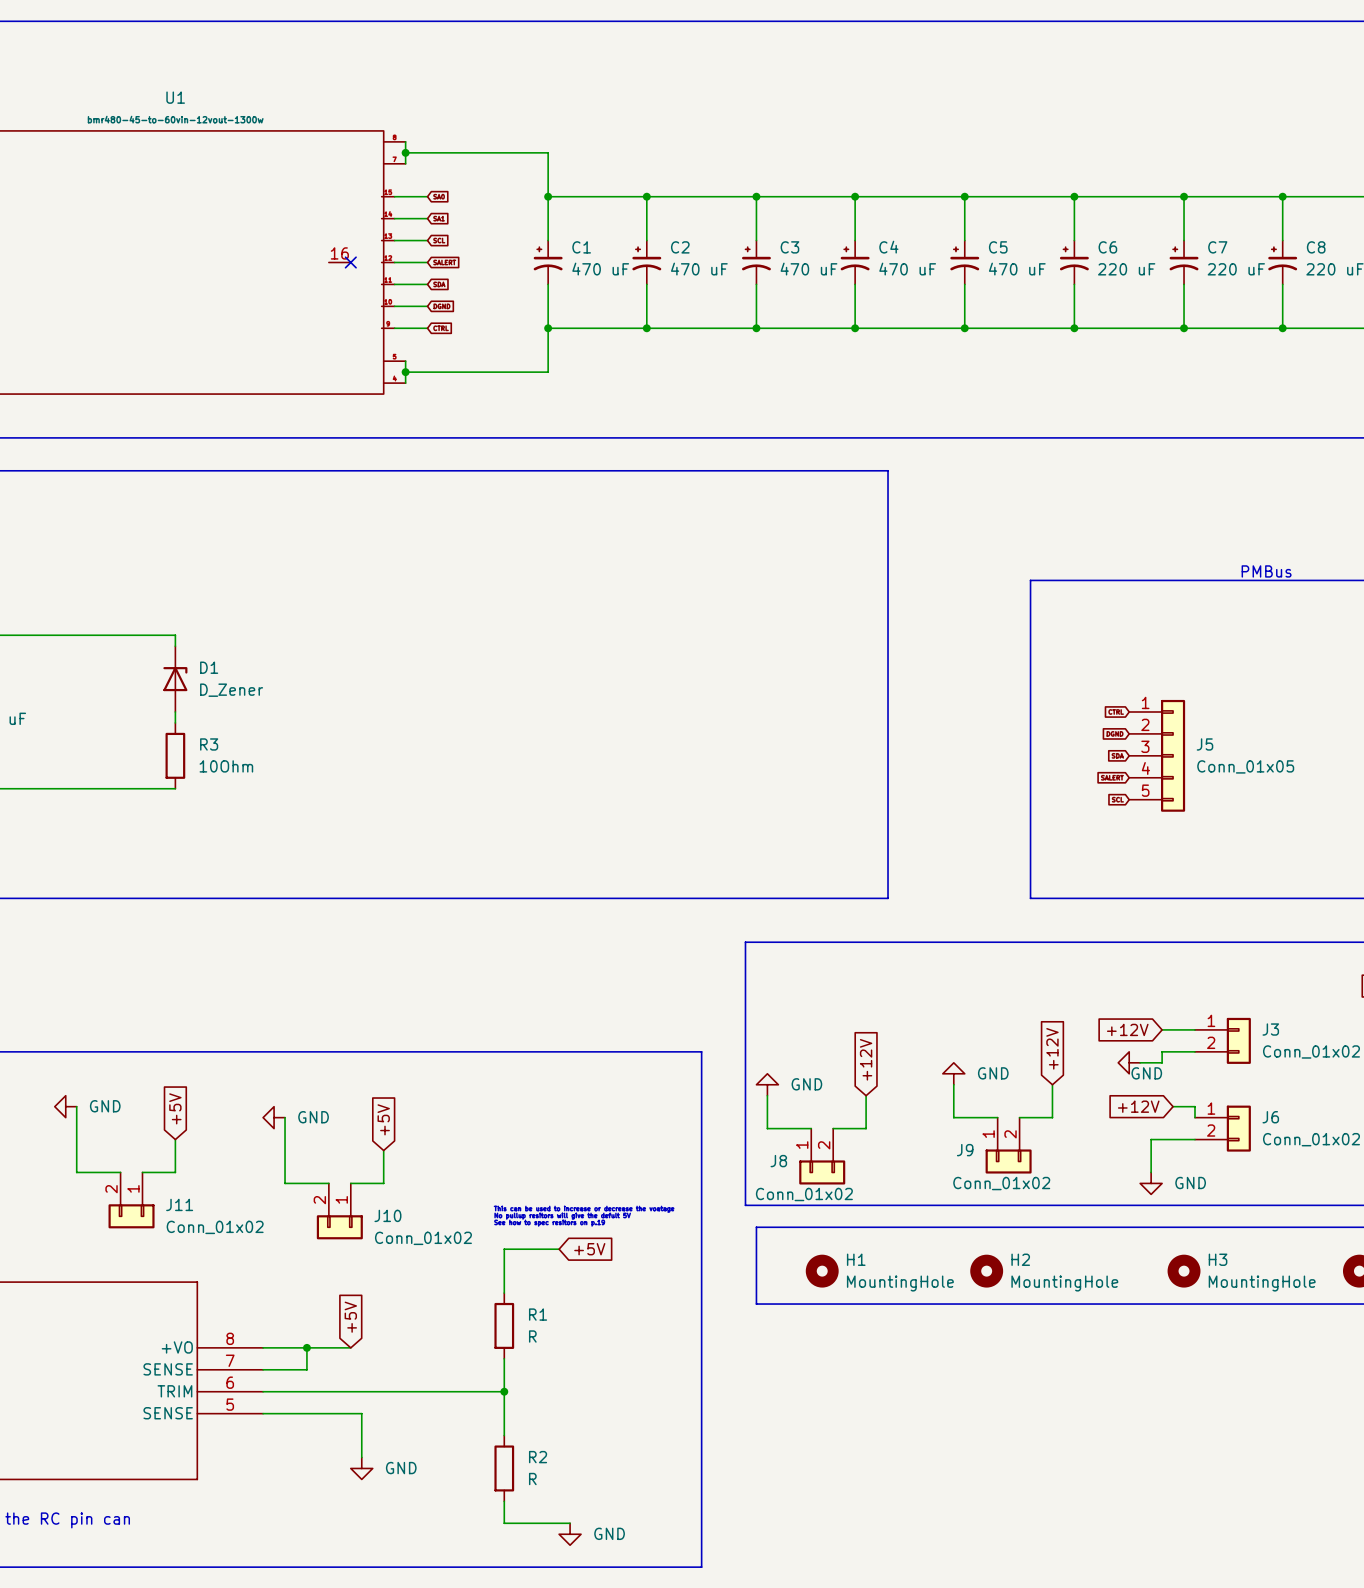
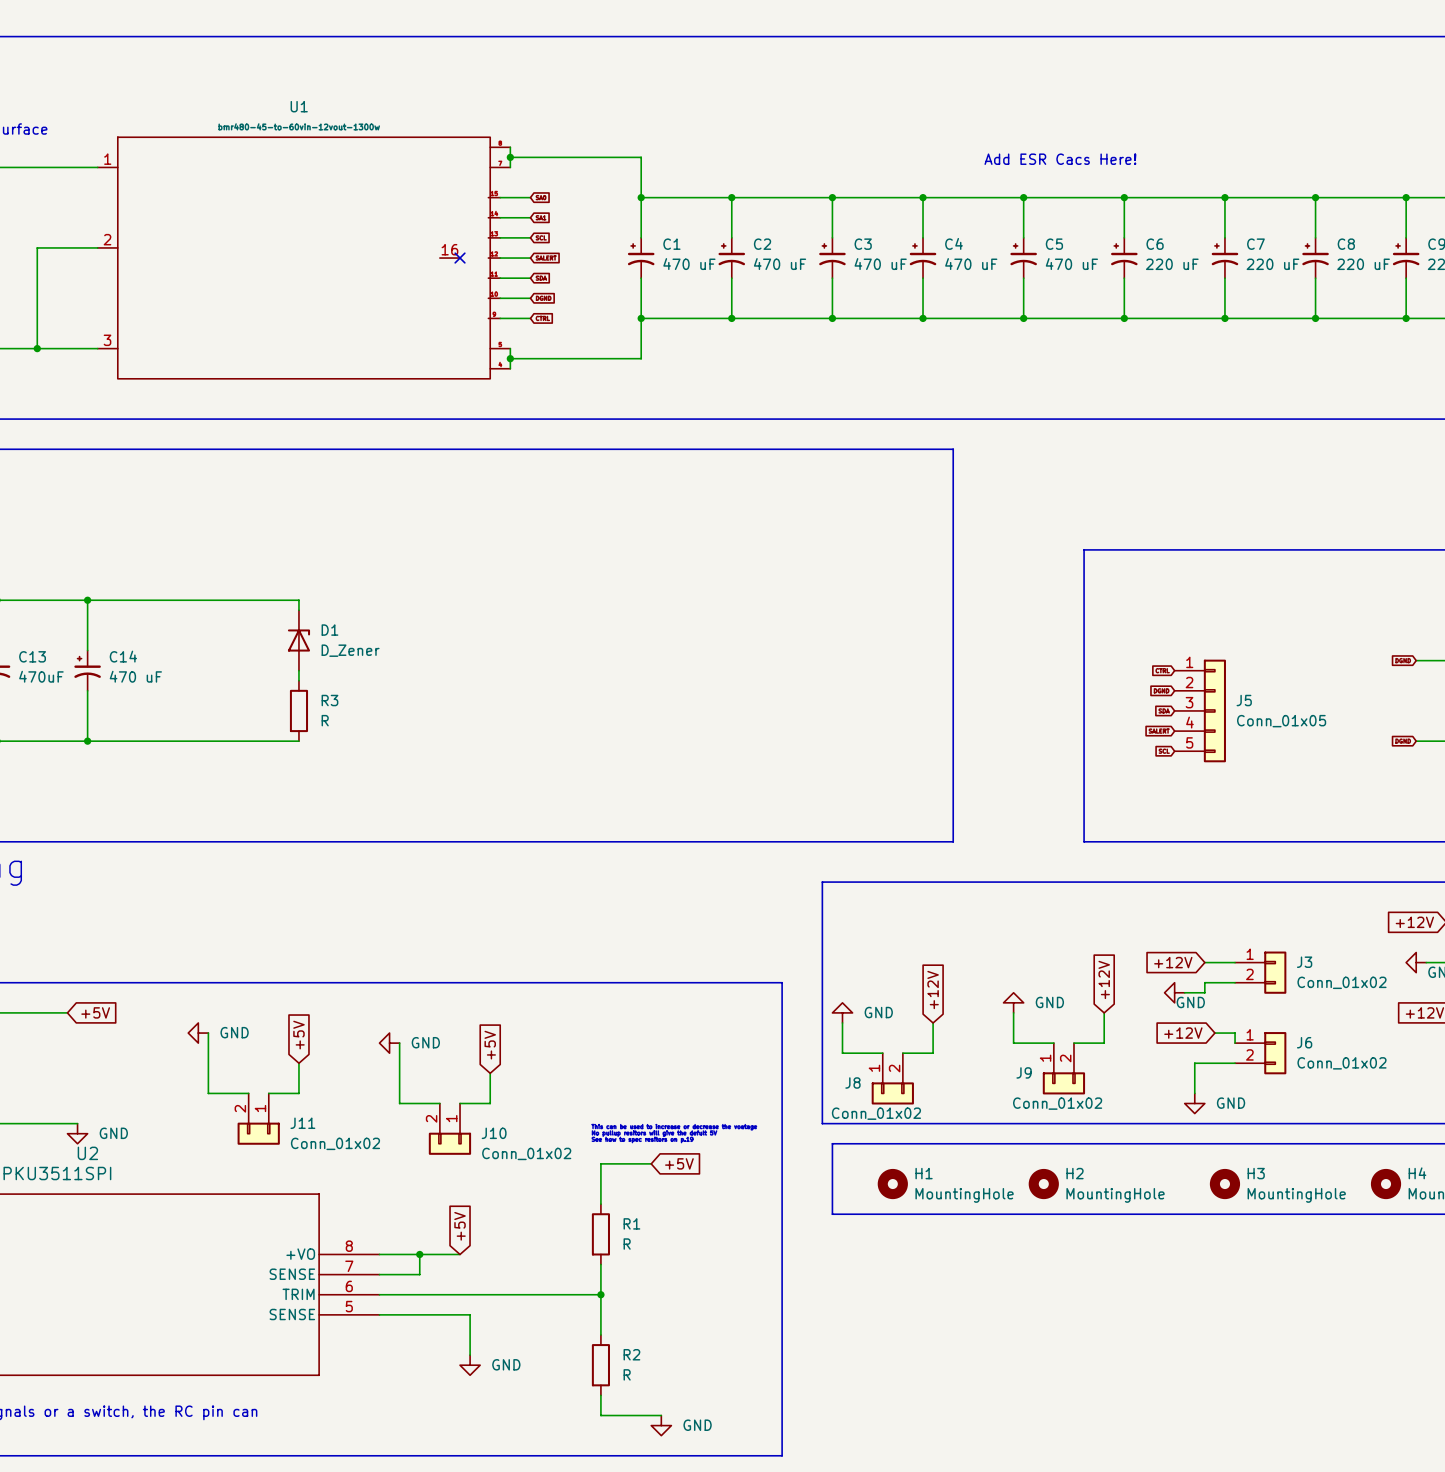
text: none -> Add ESR Cacs Here! (1060, 159)
text: PMBus (1266, 571) -> none
R3 value: 10Ohm (226, 766) -> R (325, 720)

